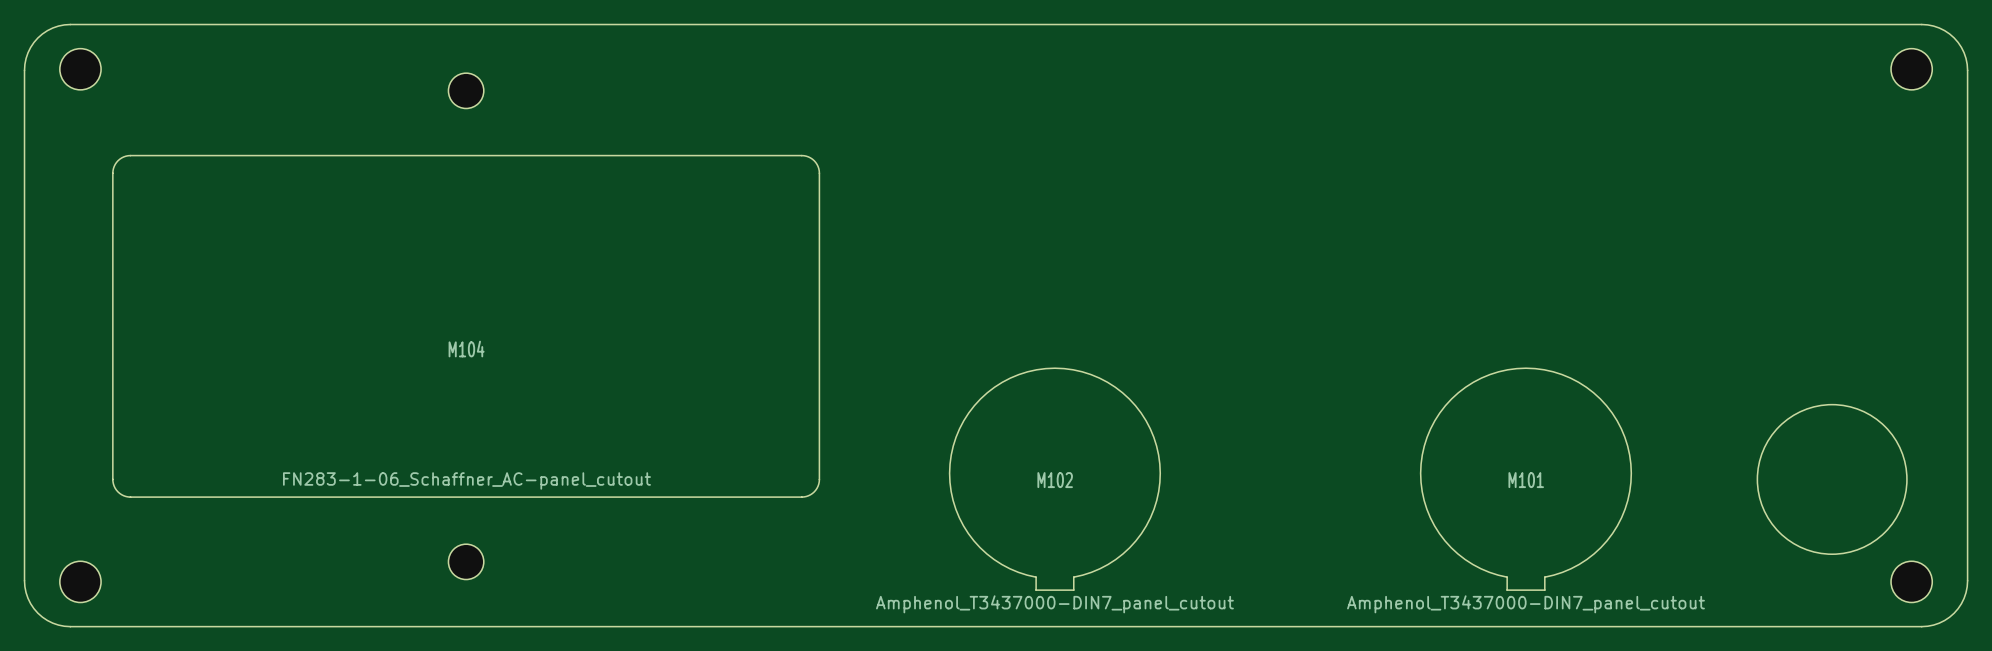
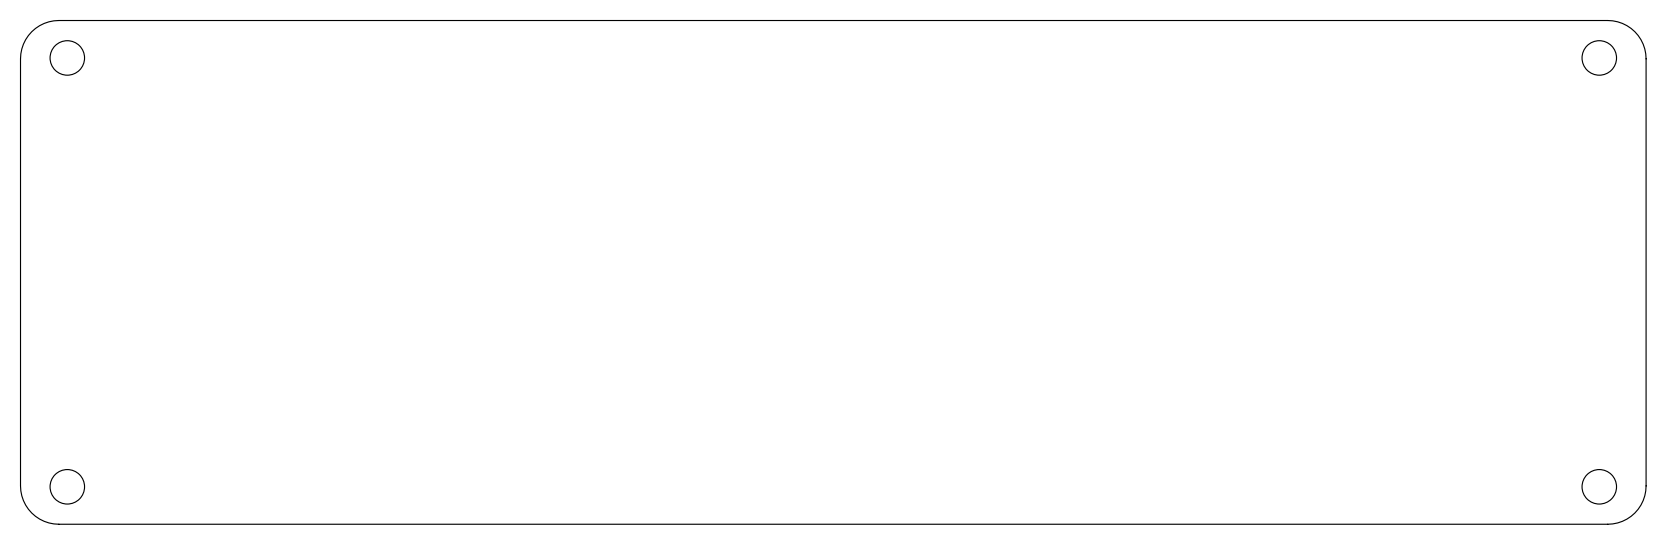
M104: FN283-1-06_Schaffner_AC-panel_cutout (466, 326) -> none
drawing: [1756, 403, 1908, 555] -> none
M102: Amphenol_T3437000-DIN7_panel_cutout (1054, 479) -> none
M101: Amphenol_T3437000-DIN7_panel_cutout (1525, 479) -> none

